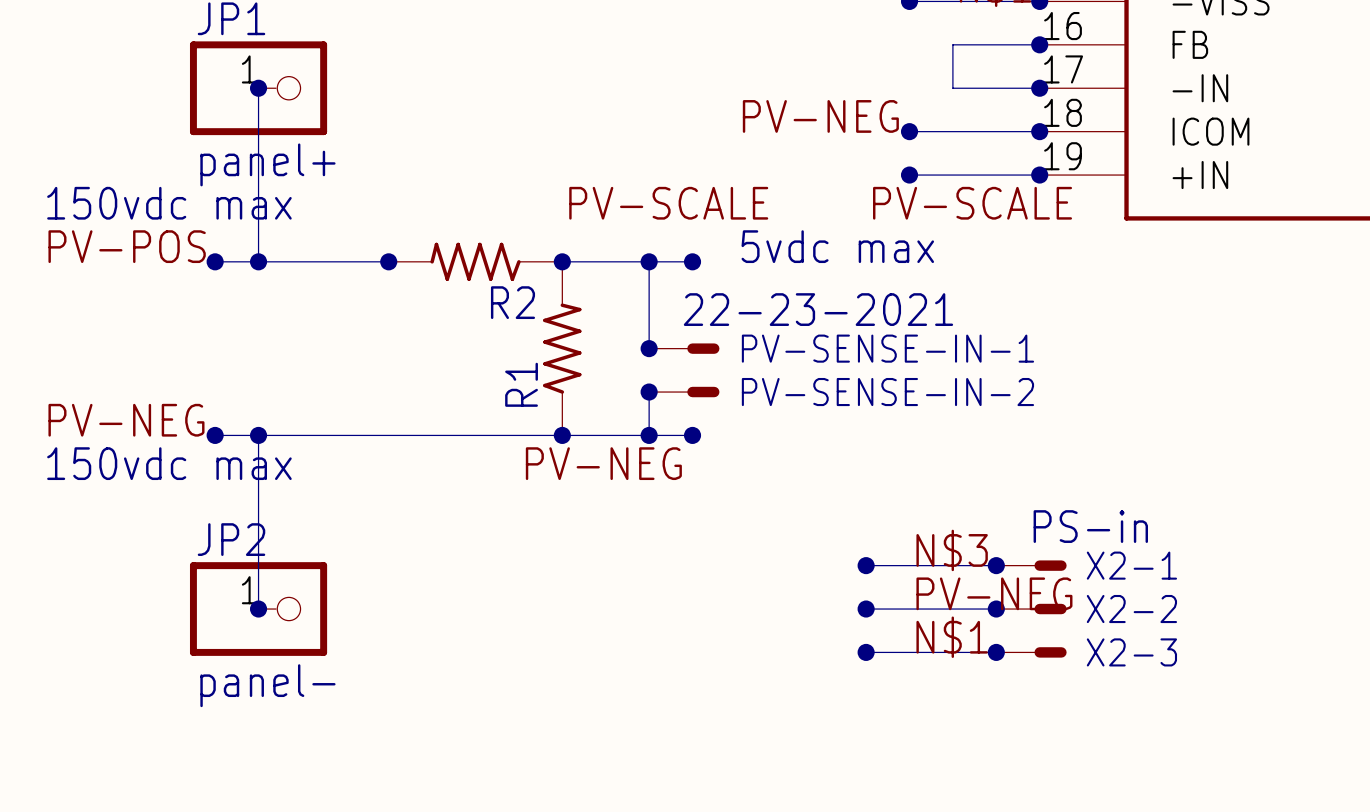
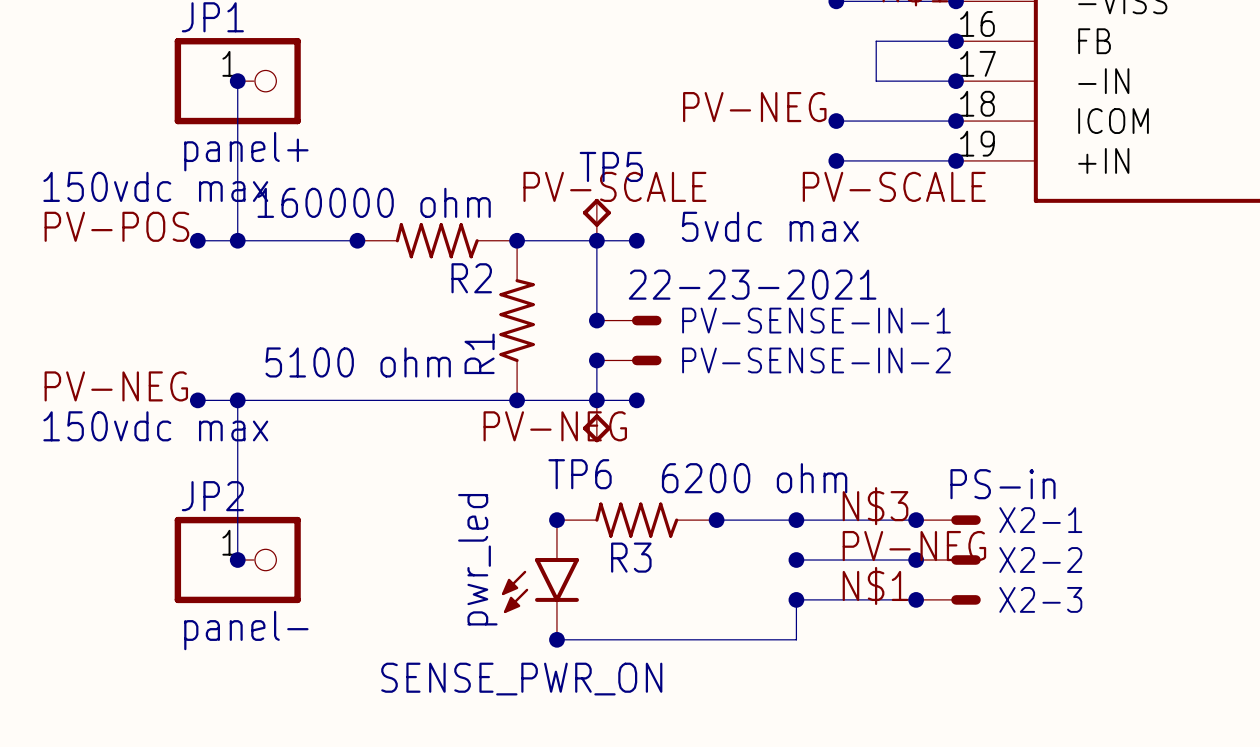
R2 value: none -> 160000 ohm (374, 202)
TP5: none -> (596, 219)
R1 value: none -> 5100 ohm (358, 362)
TP6: none -> (596, 421)
junction: none -> (556, 520)
R3: none -> 6200 ohm (636, 520)
wire: none -> (716, 520) (796, 520)
junction: none -> (716, 520)
SENSE_PWR_ON: none -> pwr_led (540, 579)
wire: none -> (796, 599) (796, 639) (556, 639)
junction: none -> (556, 639)

